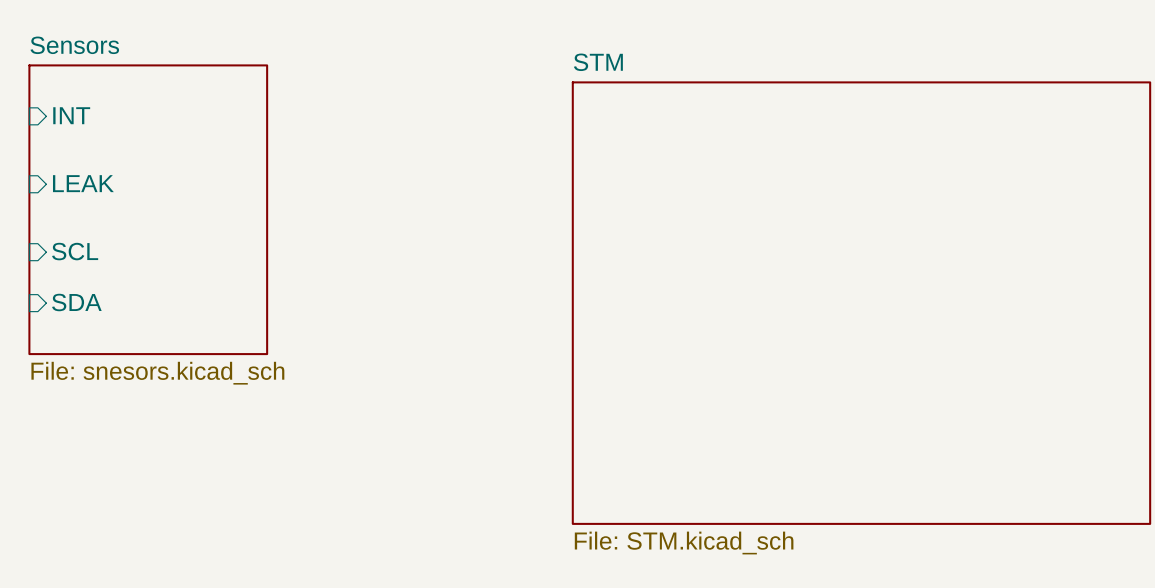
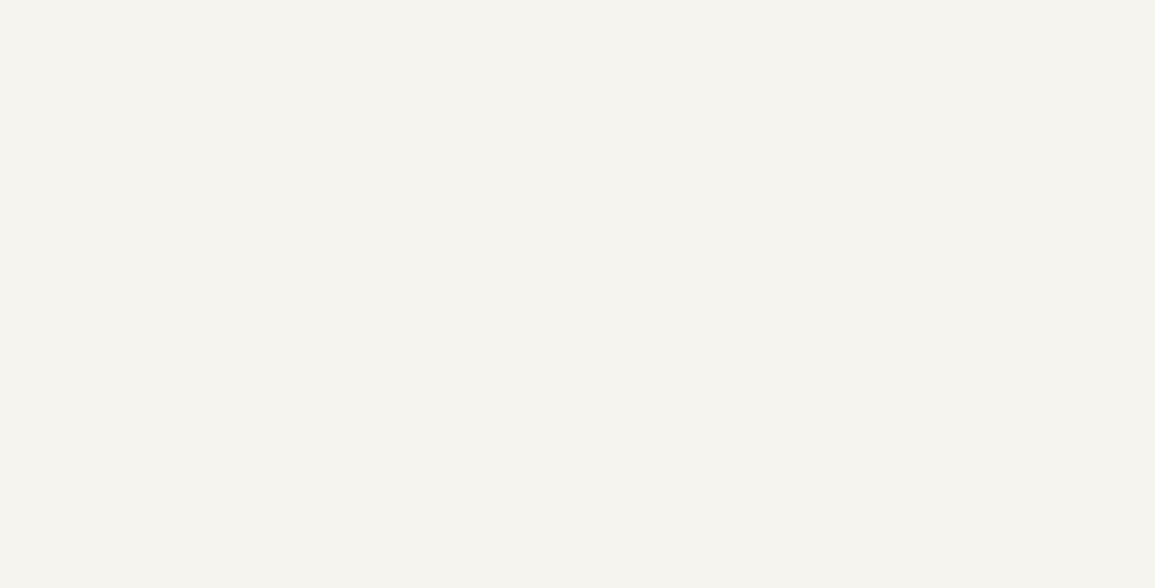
sheet pin: INT (71, 115) -> none
sheet pin: LEAK (83, 183) -> none
sheet Sensors: File: snesors.kicad_sch (148, 209) -> none
sheet pin: SCL (75, 251) -> none
sheet pin: SDA (76, 302) -> none
sheet STM: File: STM.kicad_sch (861, 303) -> none

